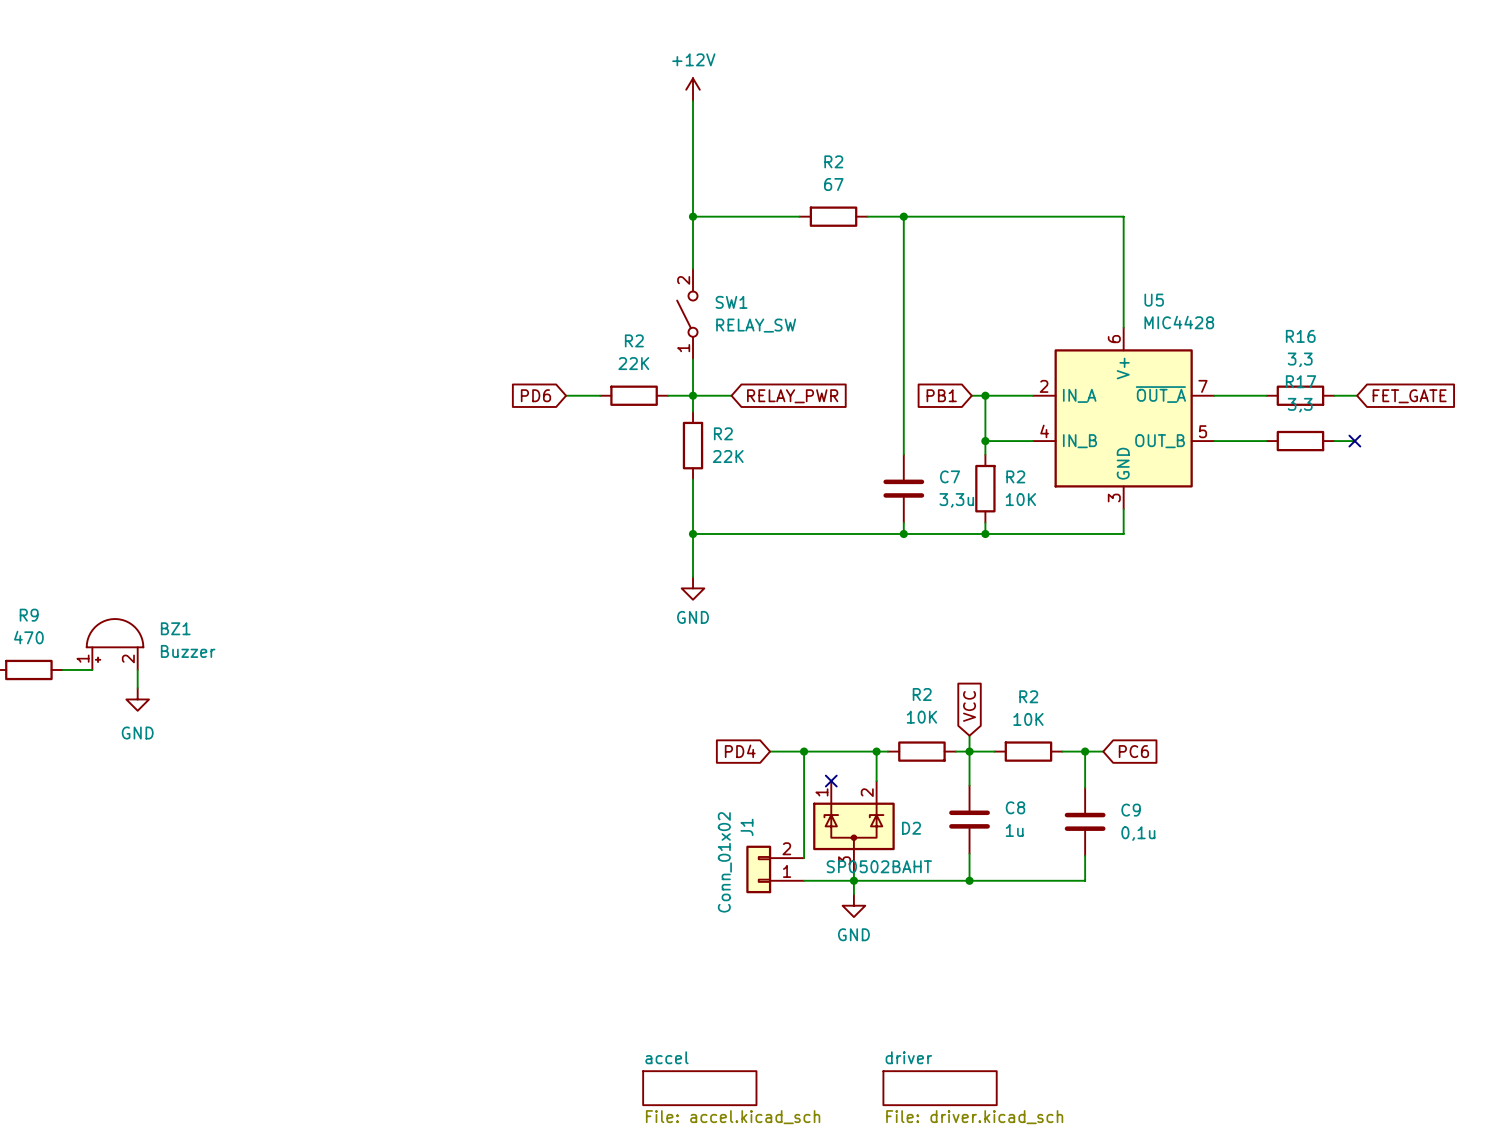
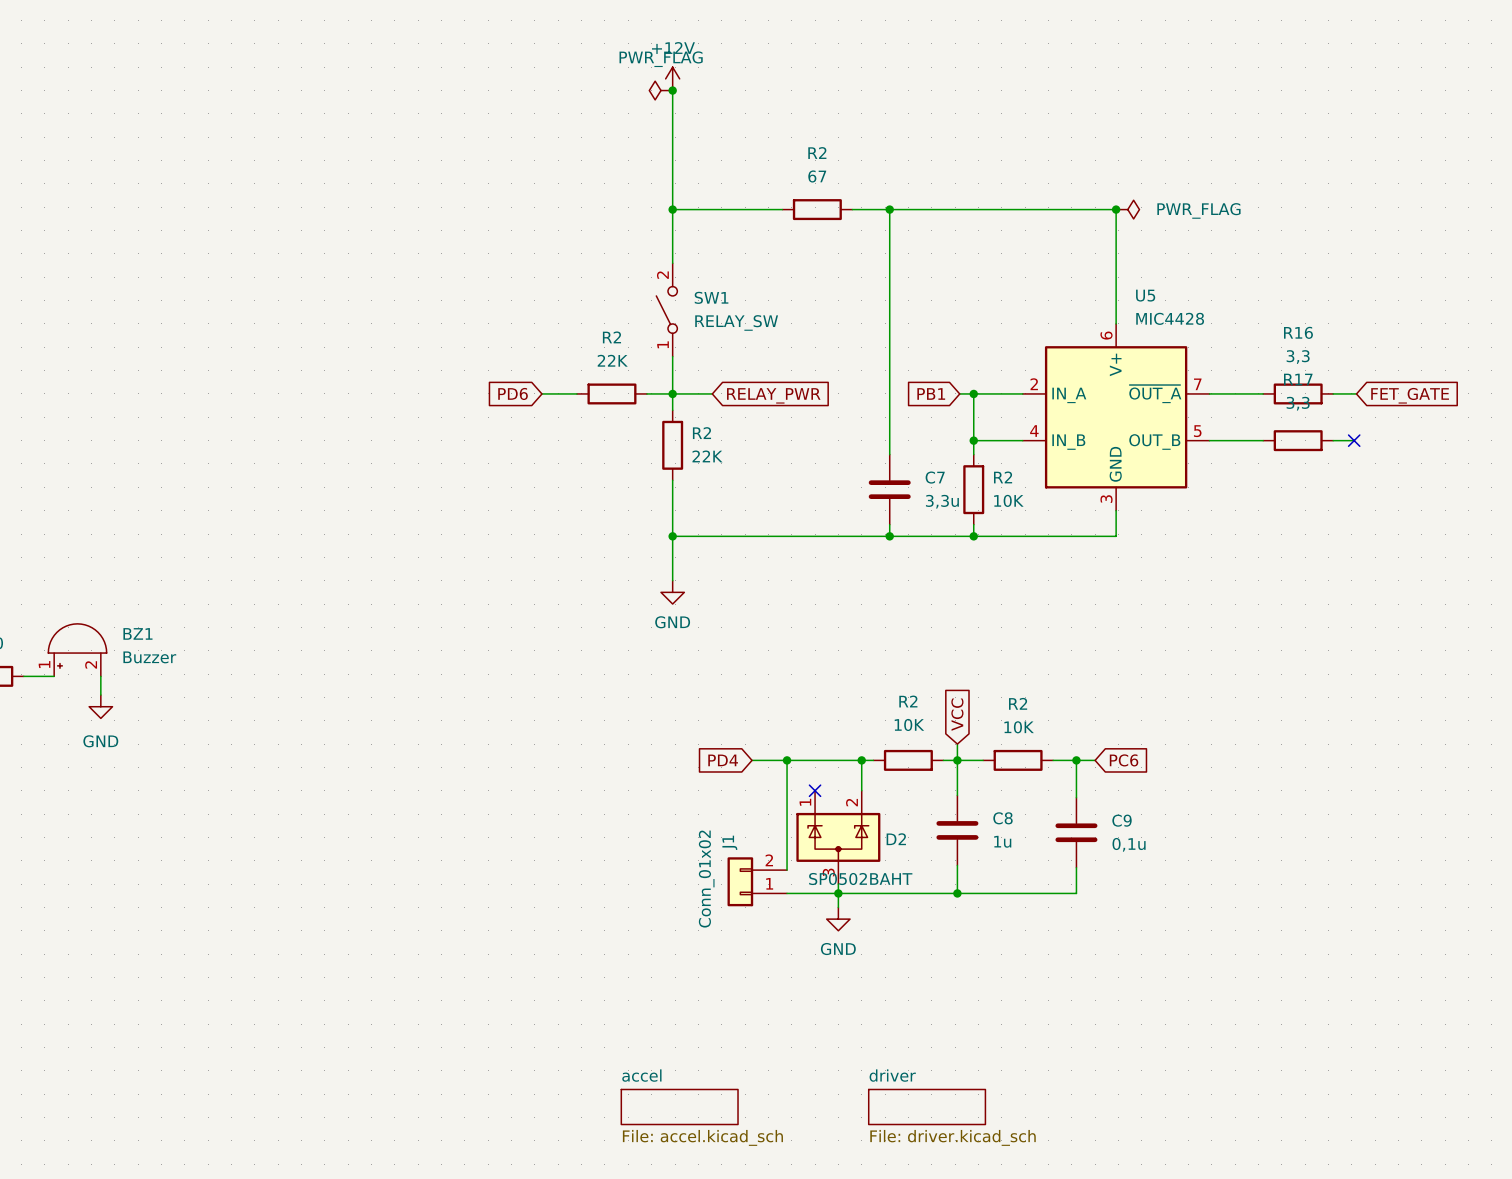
power symbol: none -> PWR_FLAG (660, 90)
junction: none -> (672, 90)
junction: none -> (1116, 209)
power symbol: none -> PWR_FLAG (1127, 209)

